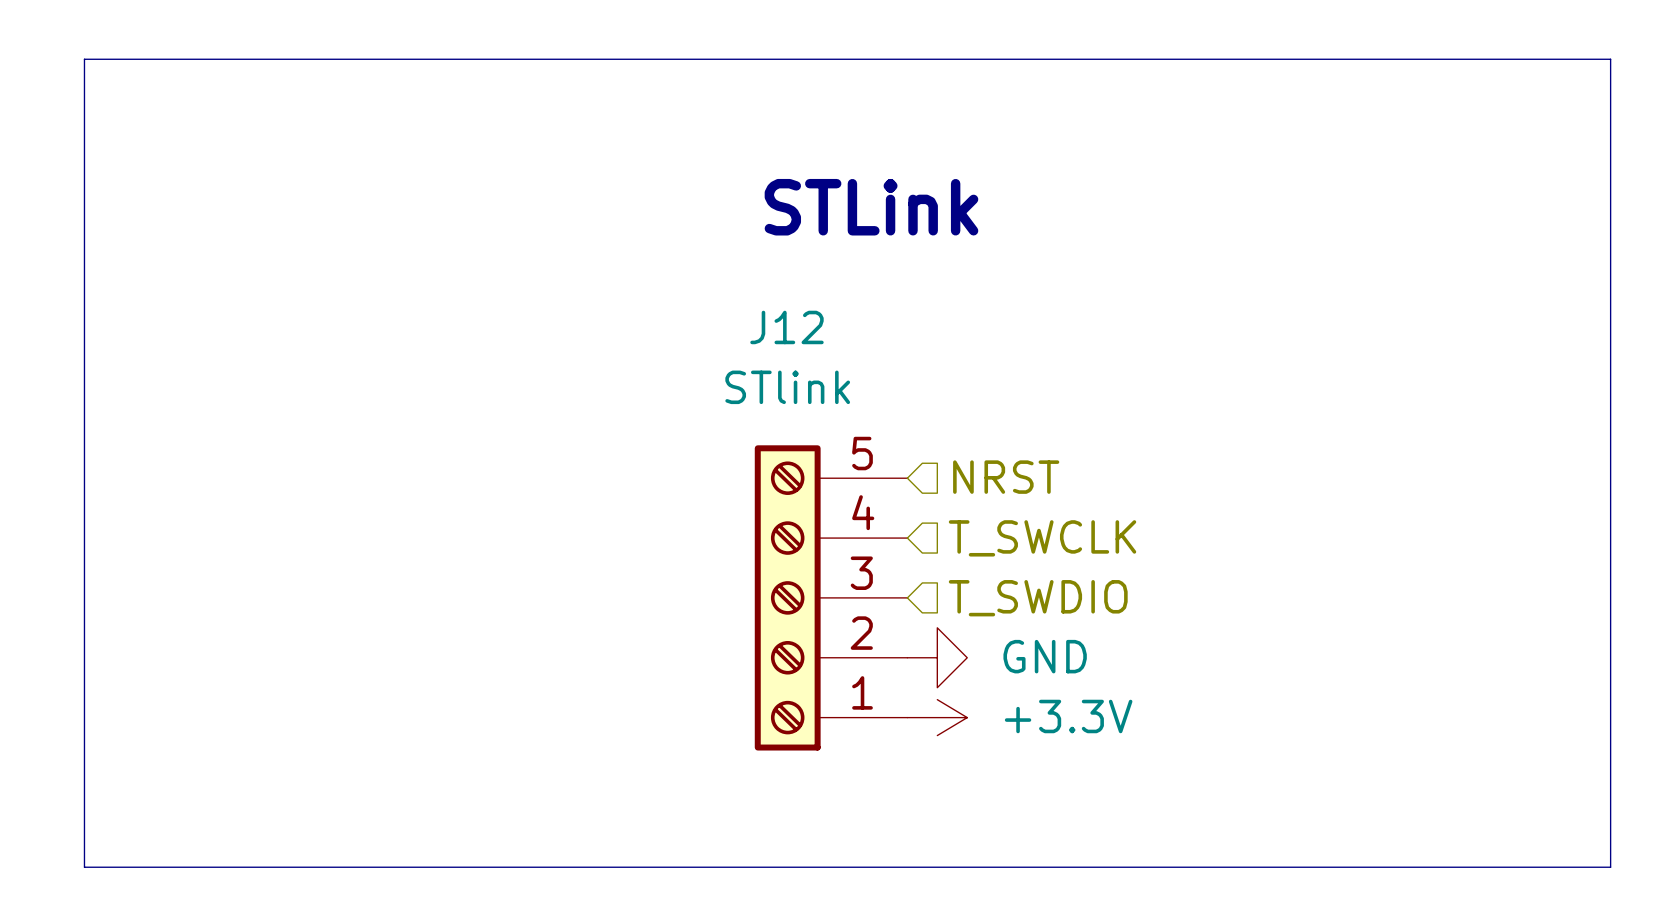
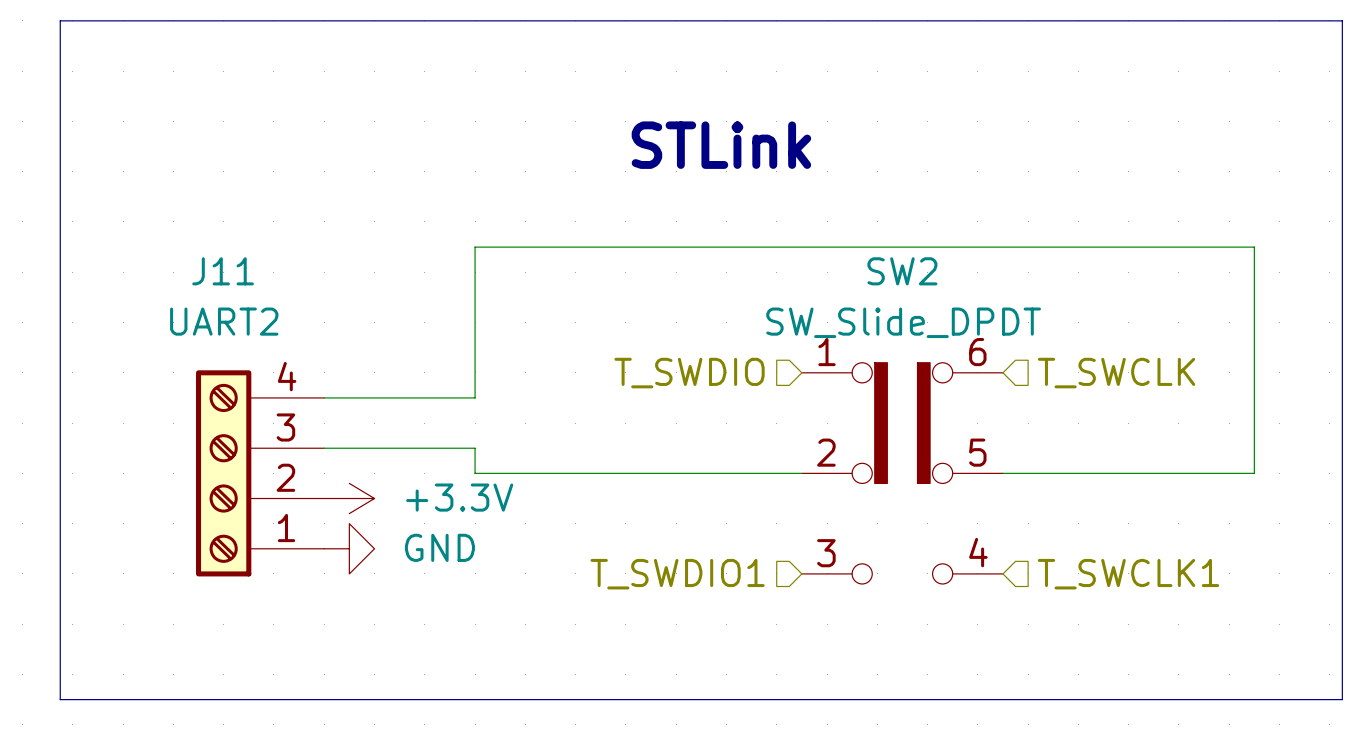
hierarchical label: NRST (1006, 477) -> none
wire: none -> (324, 397) (475, 397) (475, 247) (1254, 247) (1254, 473) (1002, 473)
hierarchical label position: T_SWCLK (1042, 538) -> T_SWCLK (1116, 373)
wire: none -> (324, 448) (475, 448) (475, 473) (801, 473)
J11: none -> UART2 (260, 473)
J12: STlink (831, 597) -> none
SW2: none -> SW_Slide_DPDT (902, 473)
hierarchical label rotation: 0° (1038, 598) -> 180° (689, 373)
hierarchical label position: T_SWDIO (1038, 598) -> T_SWDIO (689, 373)
power symbol position: GND (937, 657) -> GND (349, 548)
hierarchical label: none -> T_SWDIO1 (677, 574)
power symbol position: +3.3V (937, 717) -> +3.3V (349, 498)
hierarchical label: none -> T_SWCLK1 (1128, 574)

